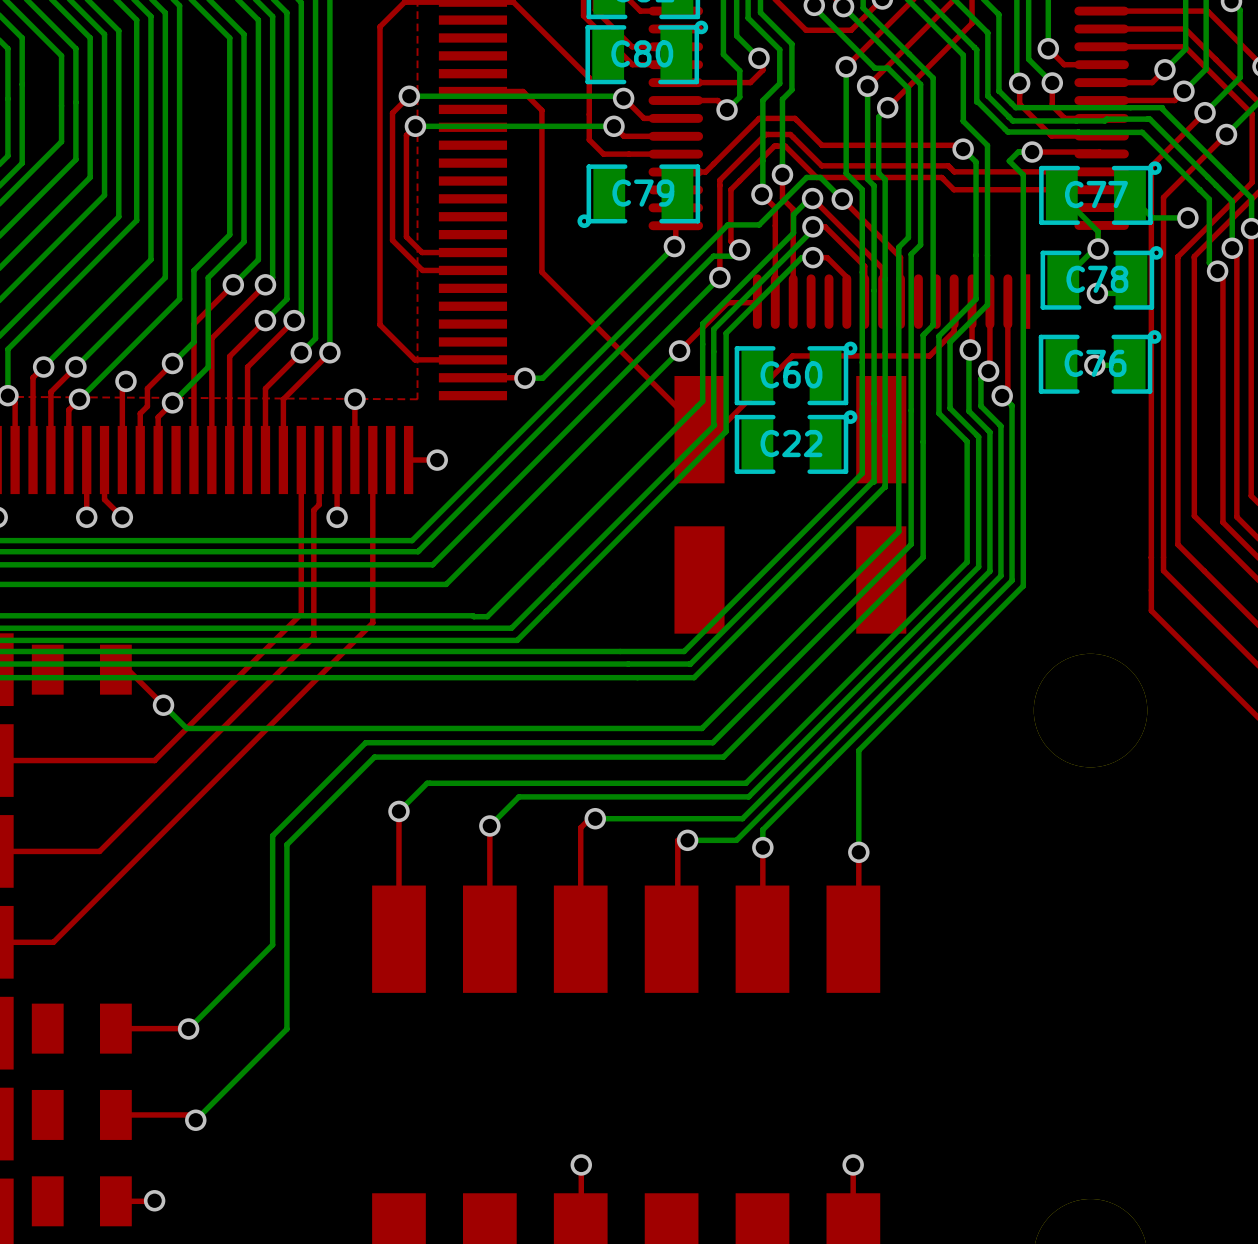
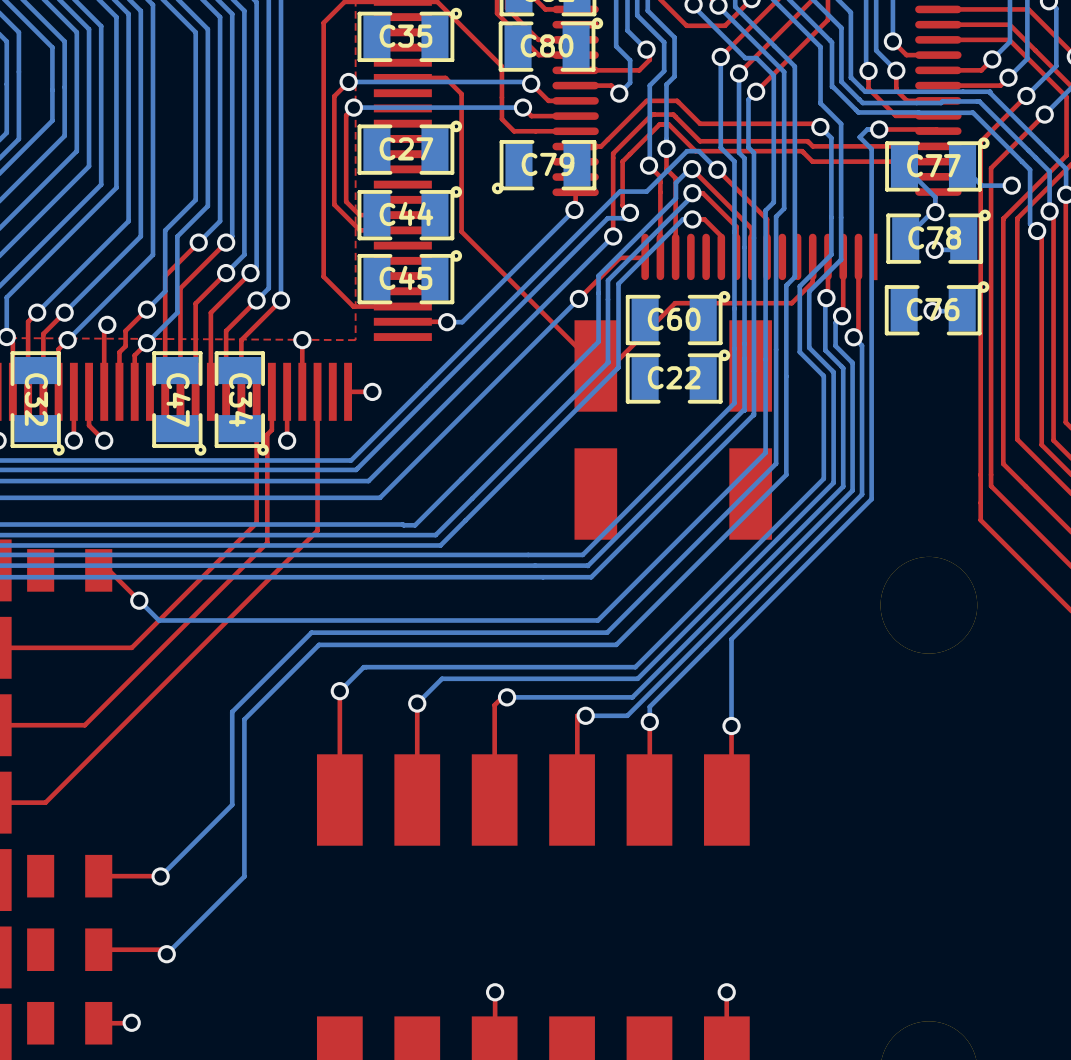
C35: none -> (409, 34)
C27: none -> (409, 147)
C44: none -> (409, 213)
C45: none -> (409, 277)
C32: none -> (37, 403)
C47: none -> (179, 403)
C34: none -> (241, 403)

